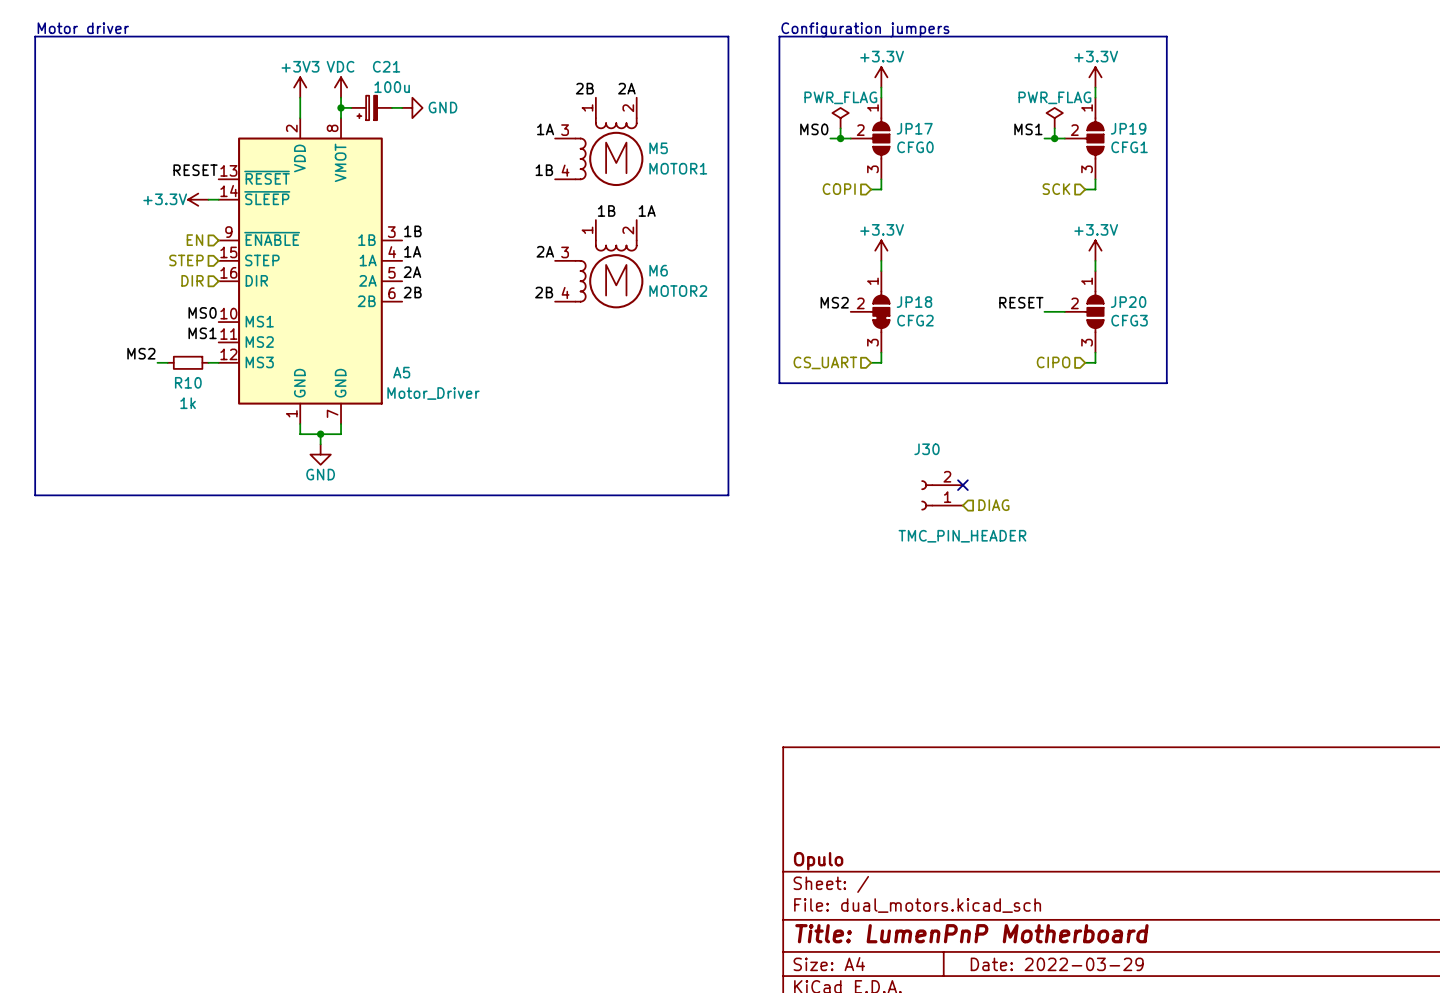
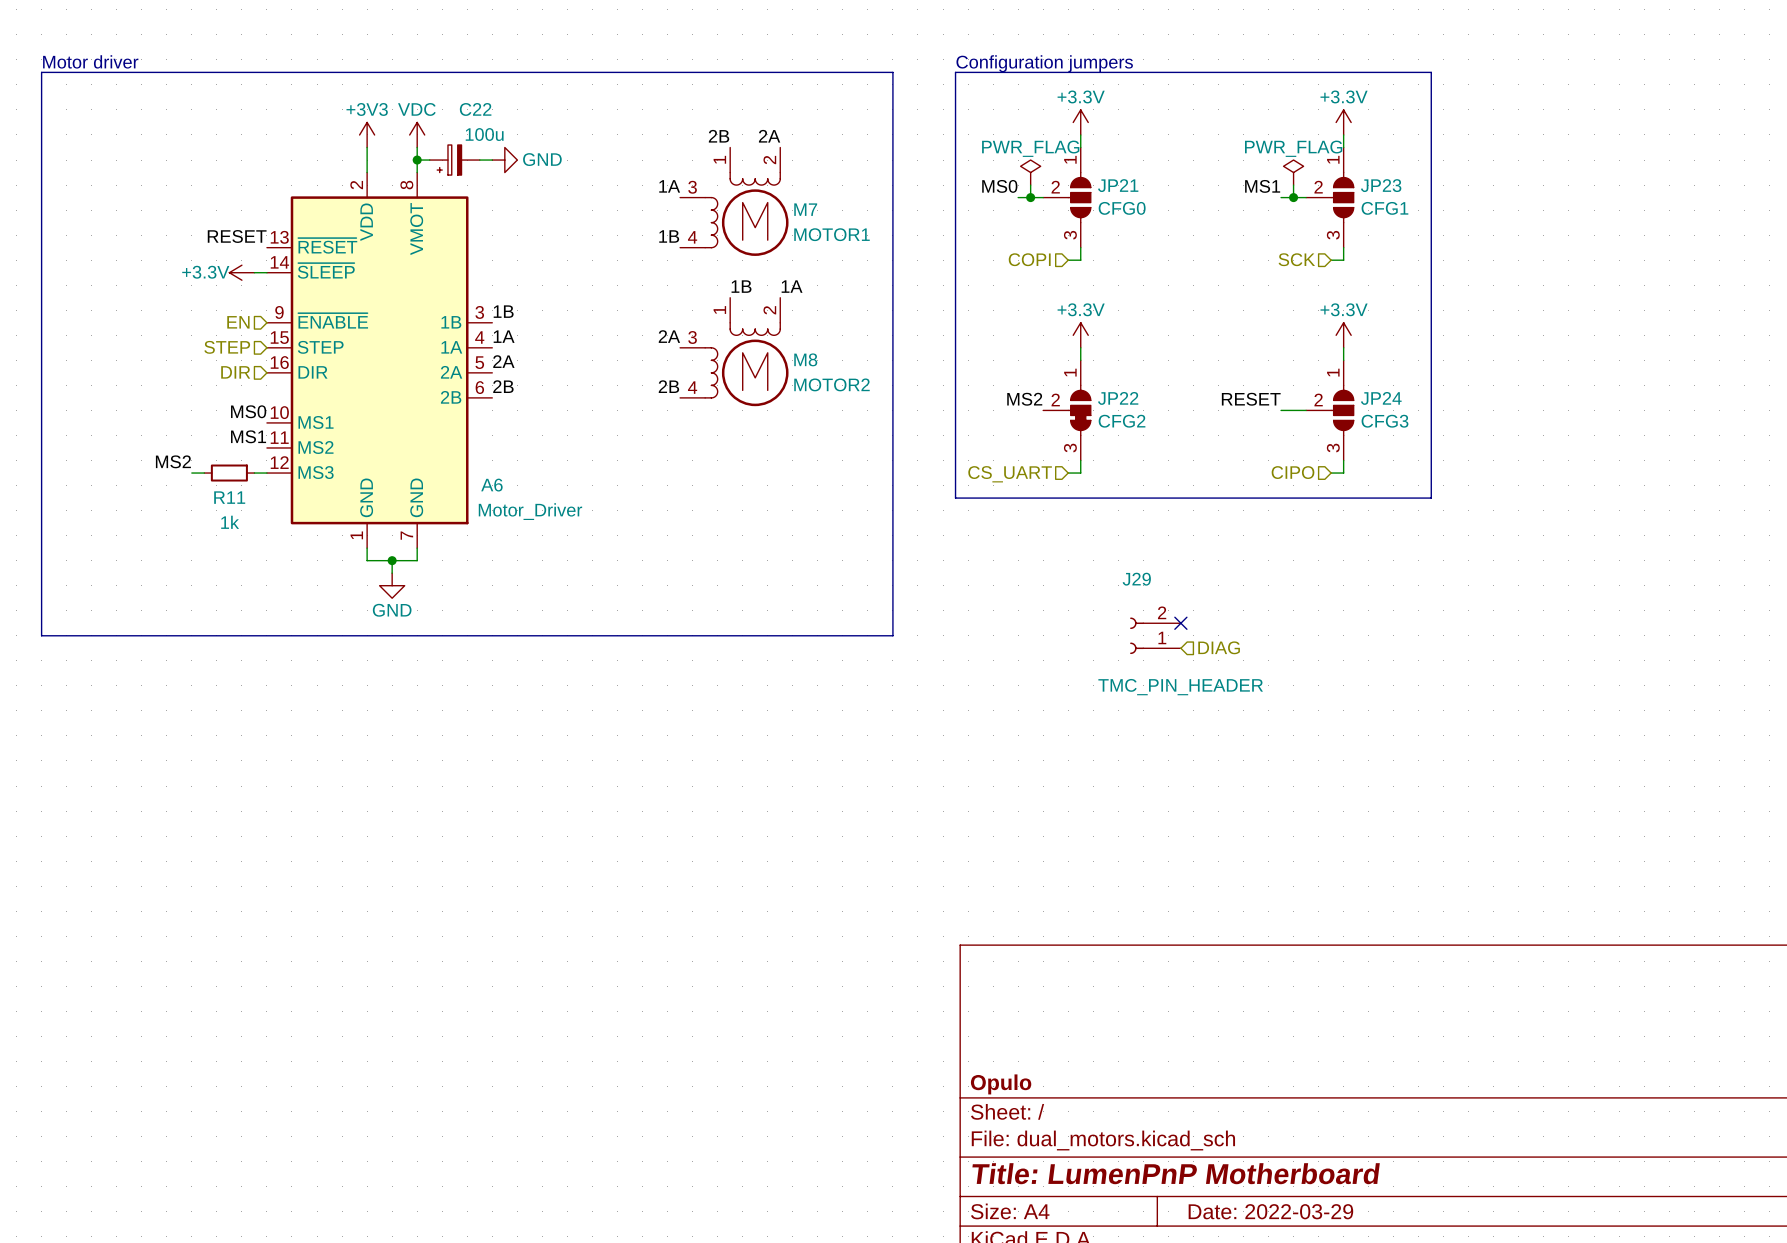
C21 name: C21 (386, 66) -> C22 (475, 109)
JP17 name: JP17 (914, 128) -> JP21 (1118, 185)
JP19 name: JP19 (1128, 128) -> JP23 (1381, 185)
M5 name: M5 (658, 148) -> M7 (805, 209)
M6 name: M6 (658, 270) -> M8 (805, 359)
JP18 name: JP18 (914, 302) -> JP22 (1118, 398)
JP20 name: JP20 (1128, 302) -> JP24 (1381, 398)
A5 name: A5 (401, 372) -> A6 (491, 485)
R10 name: R10 (188, 382) -> R11 (229, 497)
J30 name: J30 (926, 449) -> J29 (1136, 579)

